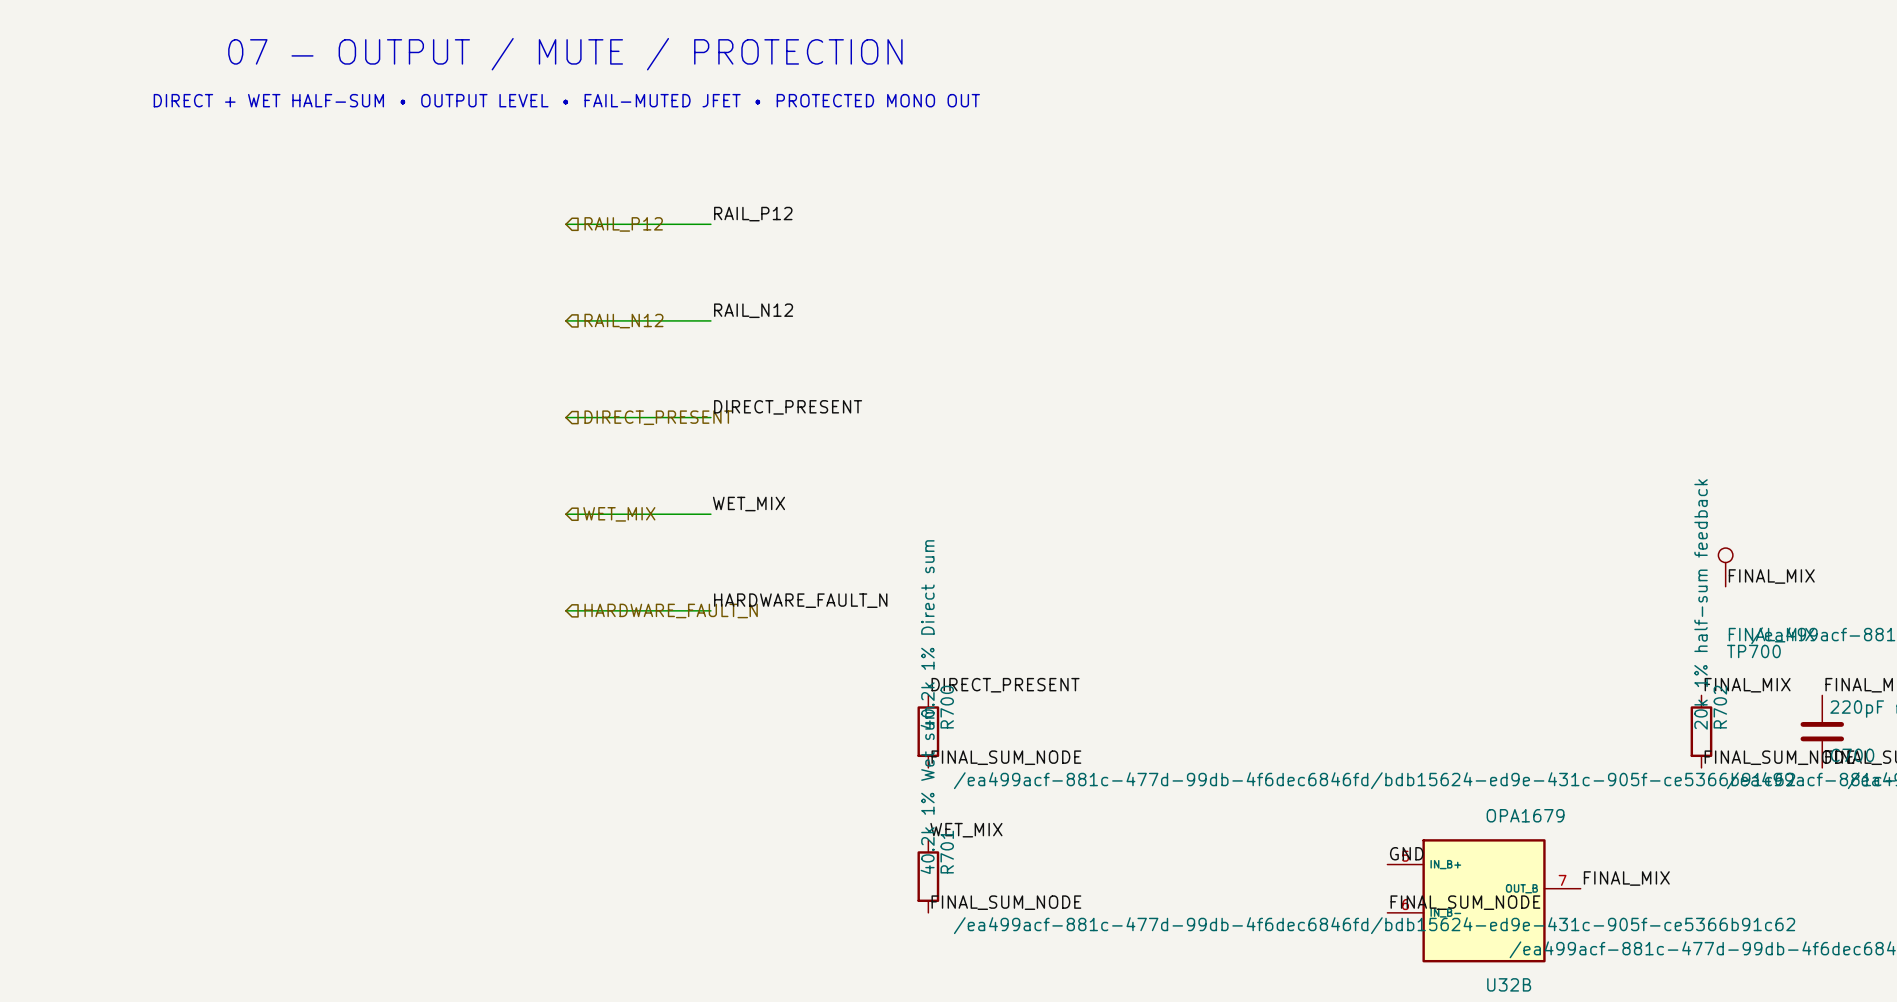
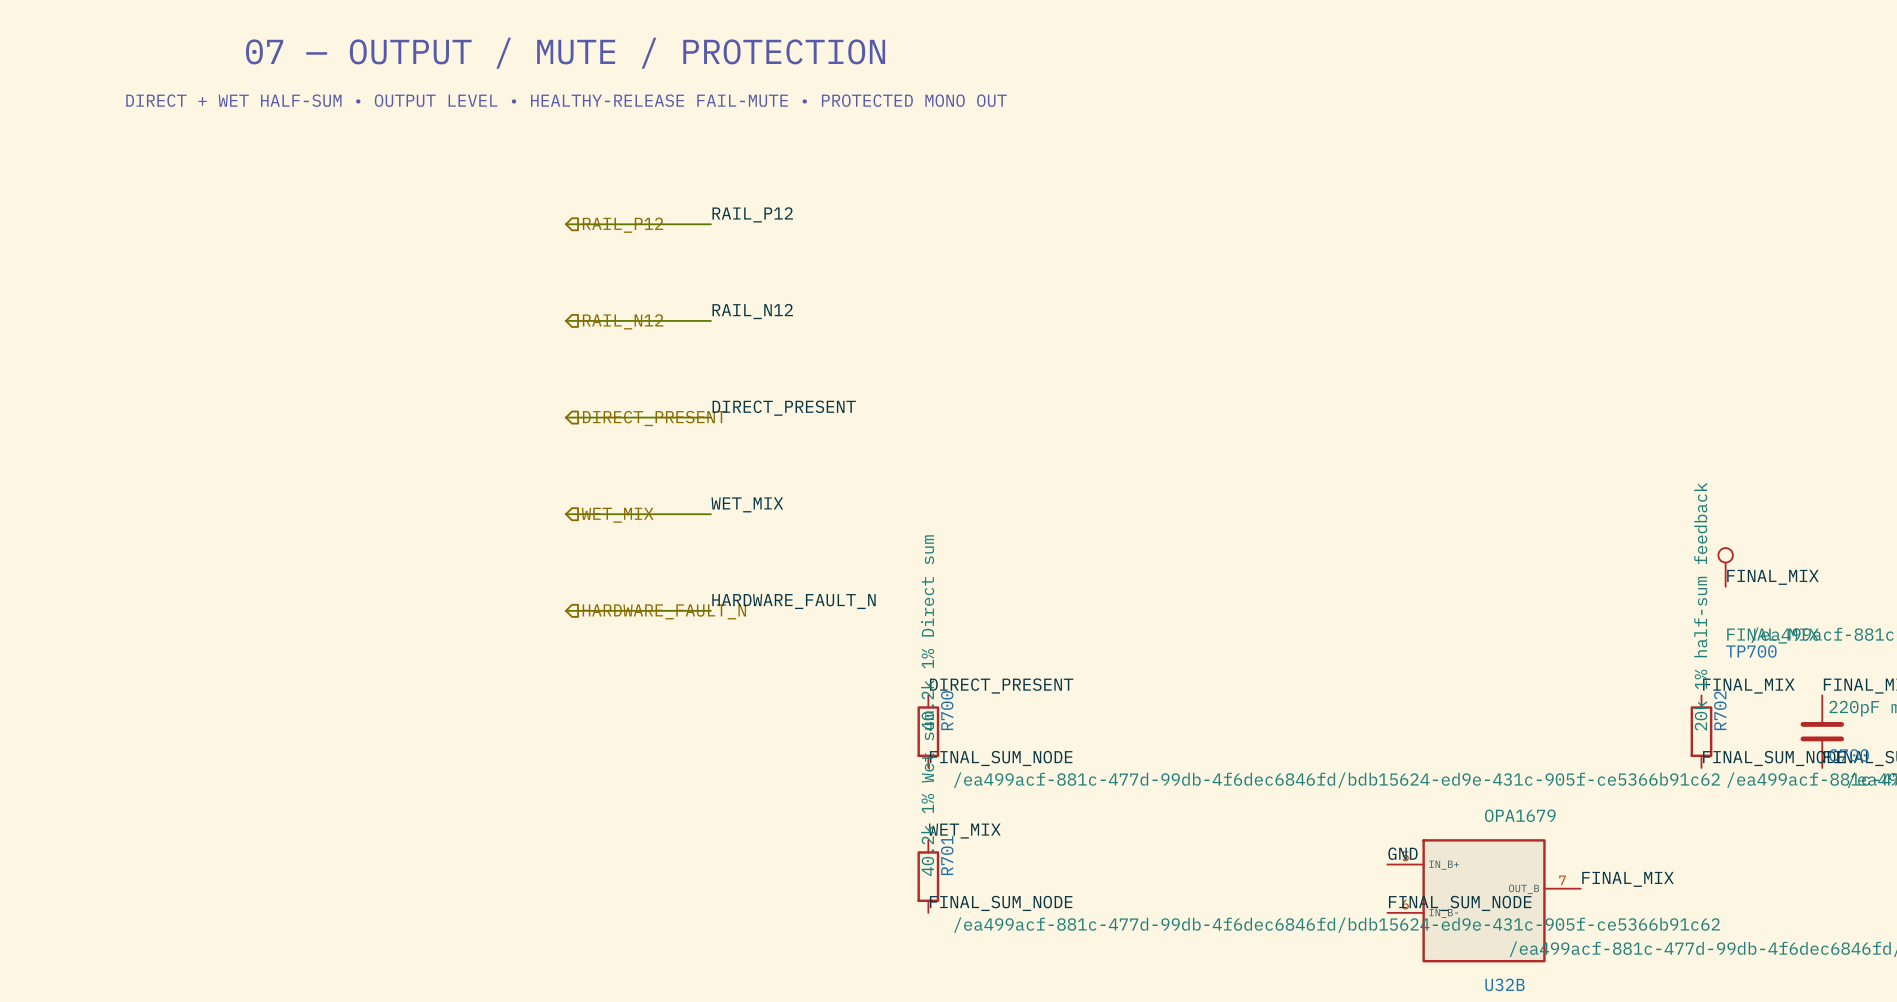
text: DIRECT + WET HALF-SUM • OUTPUT LEVEL • FAIL-MUTED JFET • PROTECTED MONO OUT (566, 100) -> DIRECT + WET HALF-SUM • OUTPUT LEVEL • HEALTHY-RELEASE FAIL-MUTE • PROTECTED MONO OUT (566, 100)

